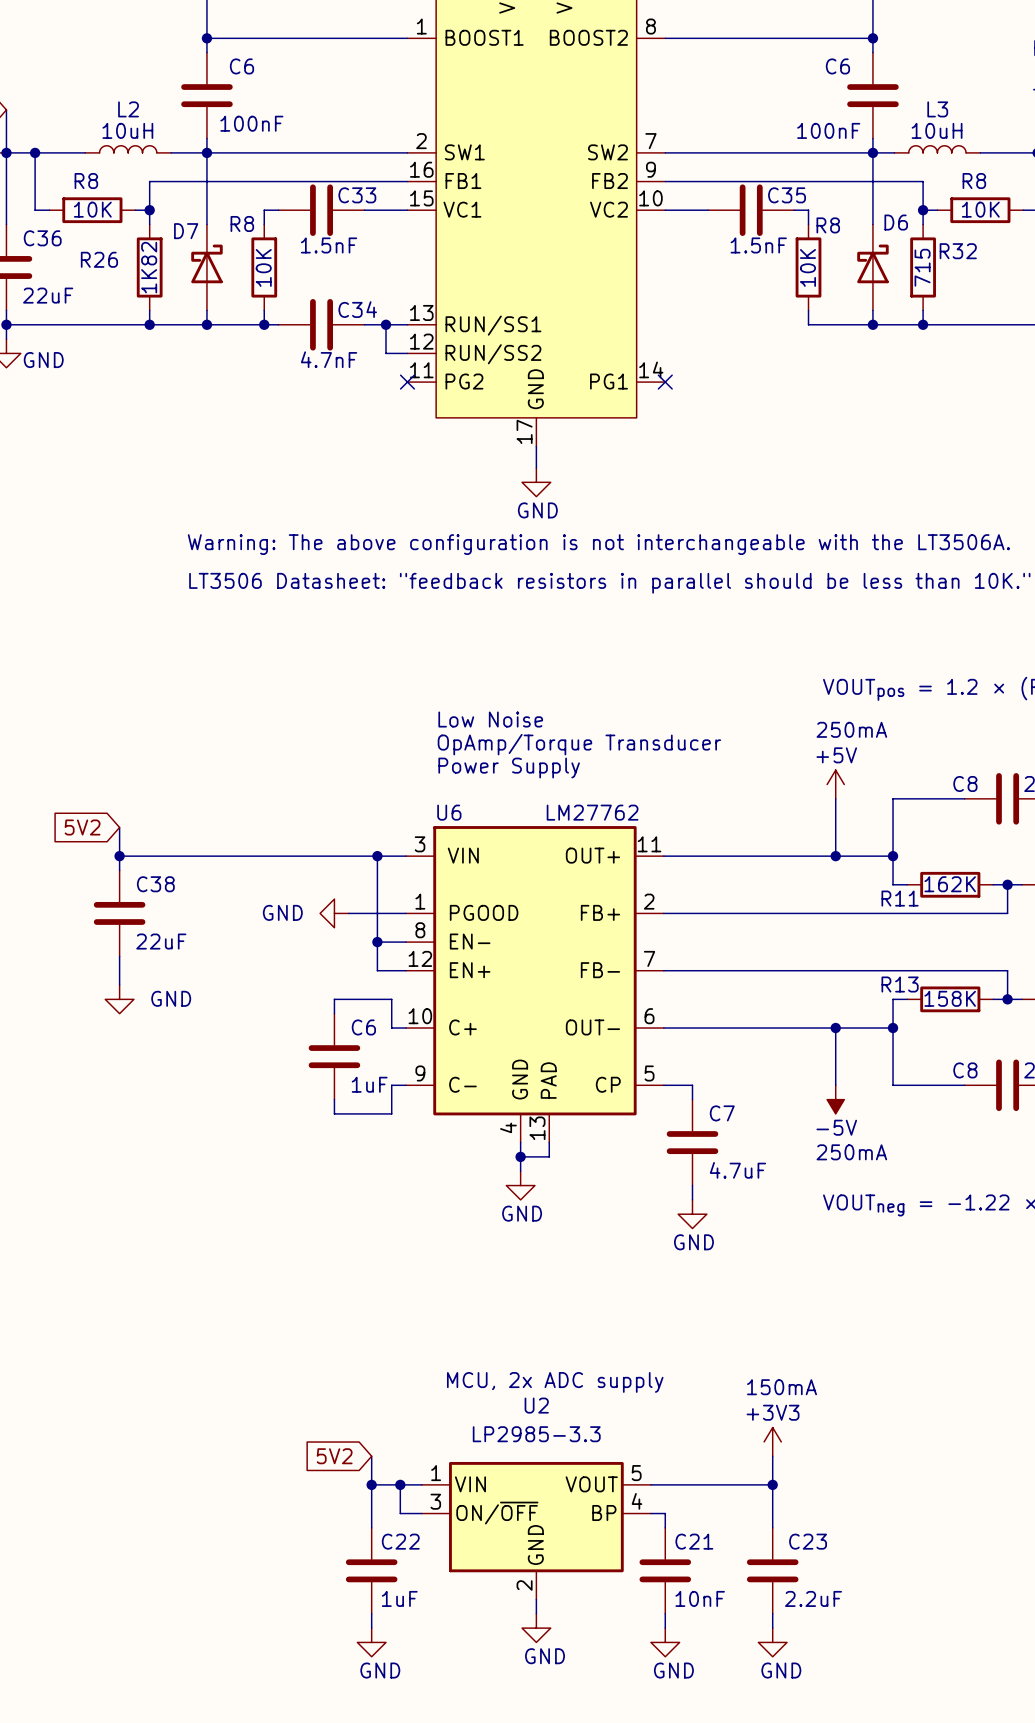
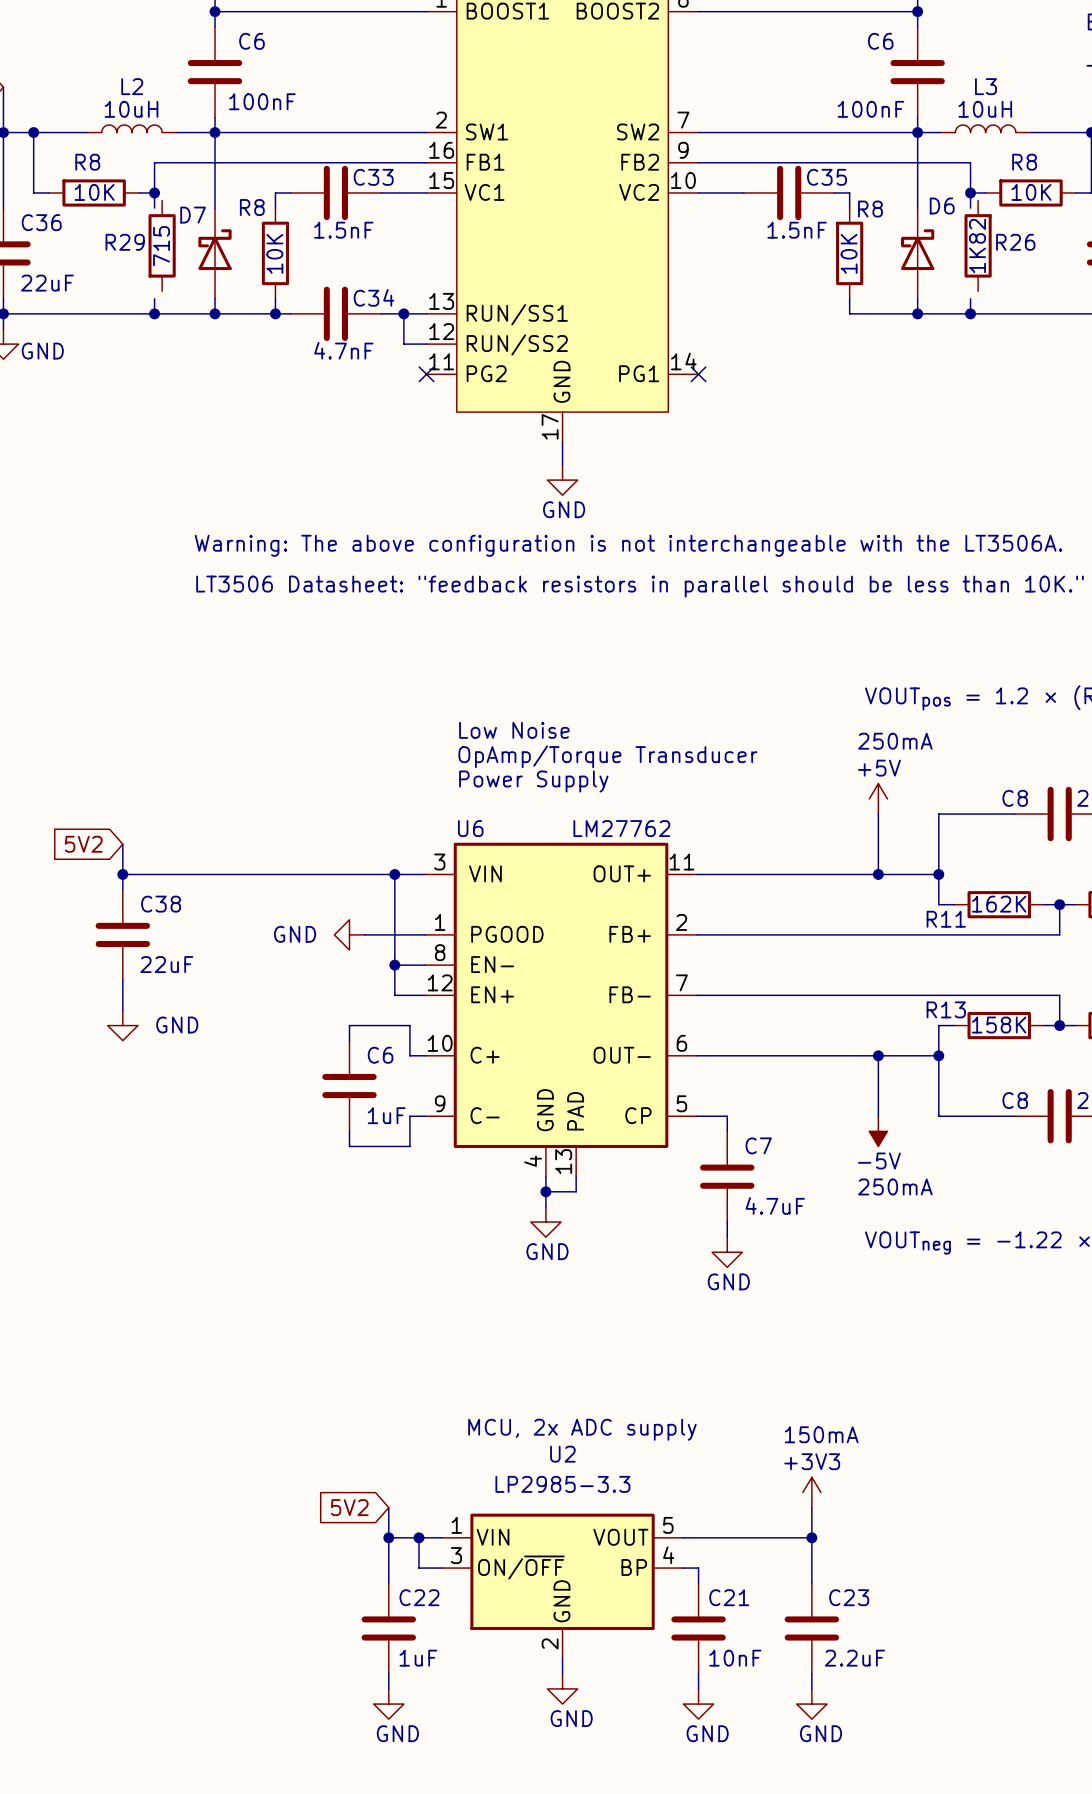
R26 name position: R26 (99, 259) -> R26 (1015, 242)
R29: none -> 715 (162, 245)
R26 position: (149, 267) -> (978, 245)
R32: 715 (923, 267) -> none

